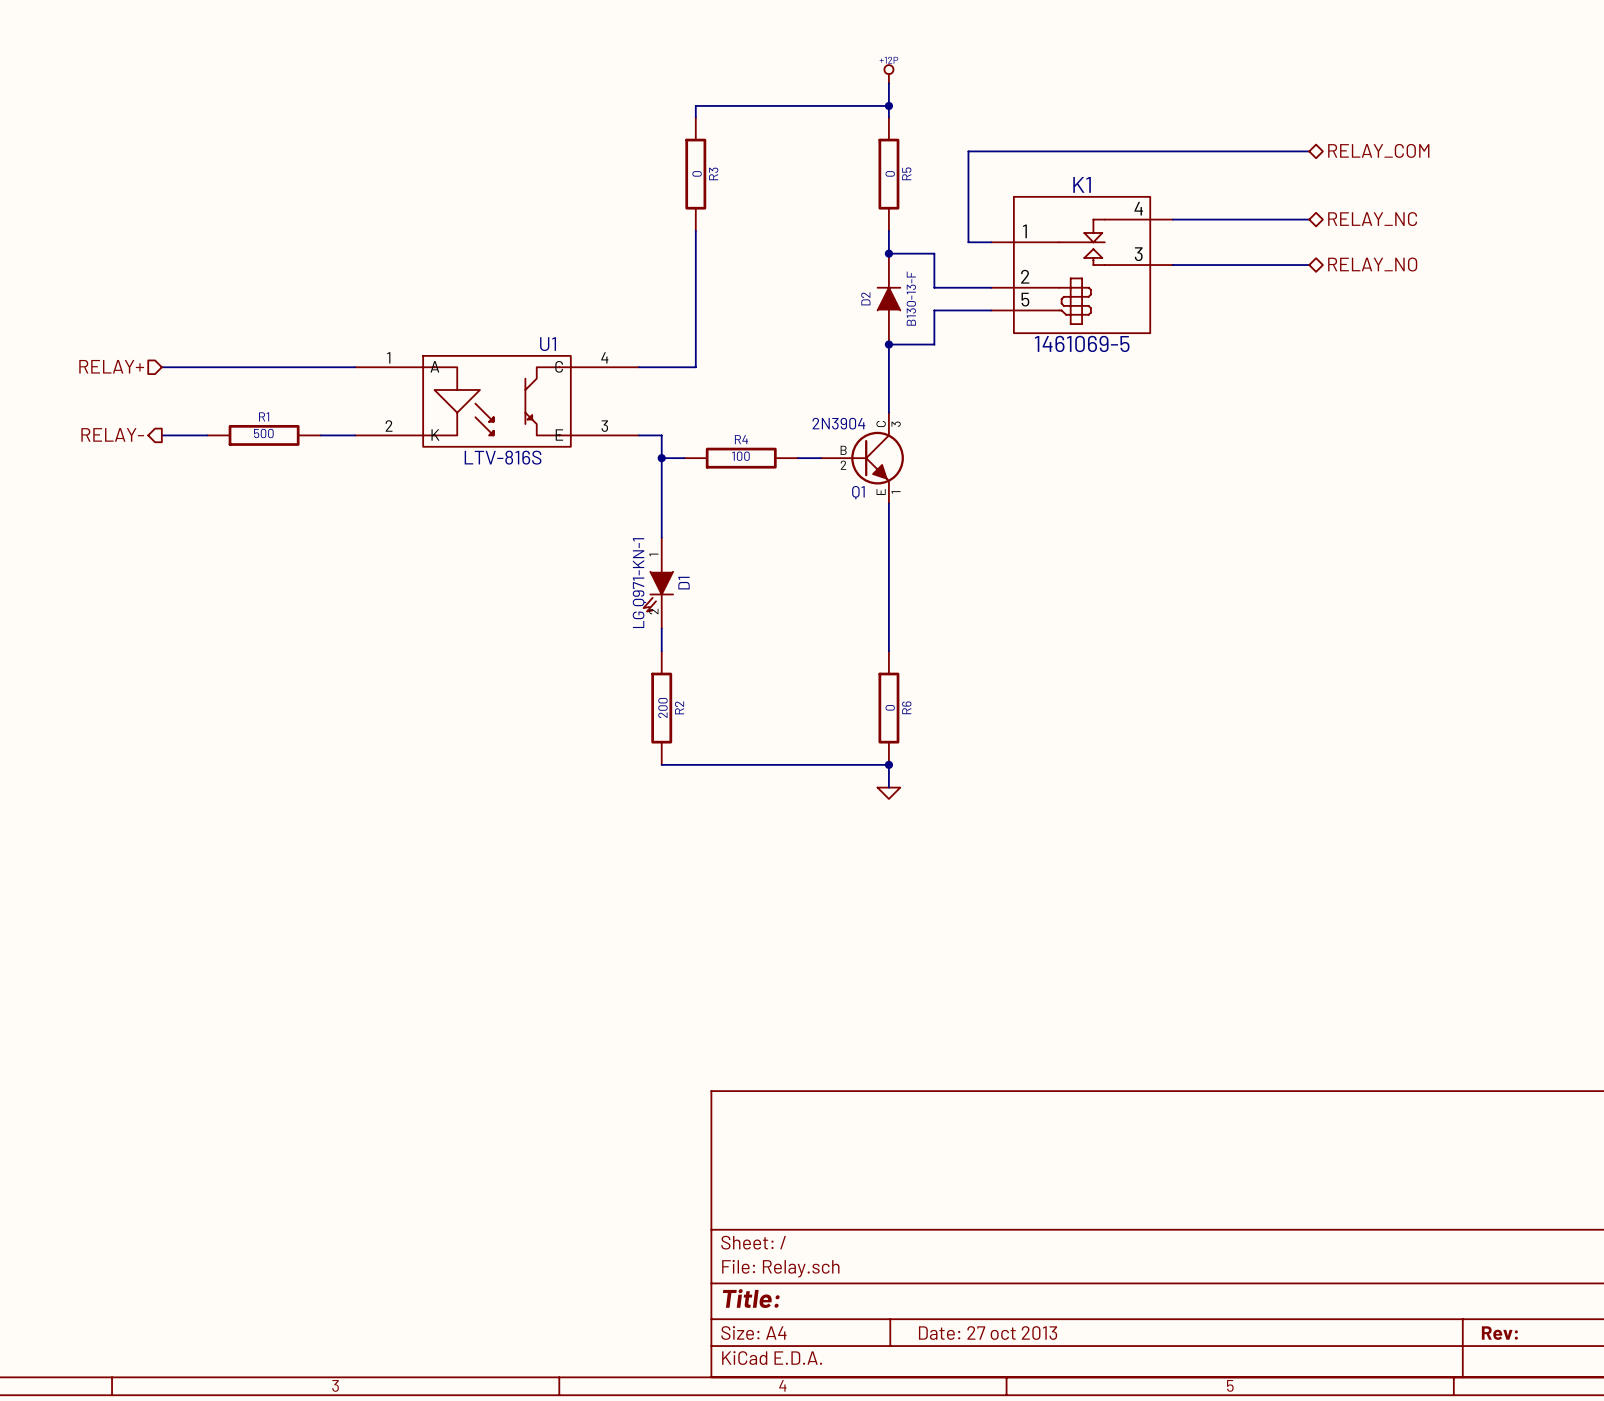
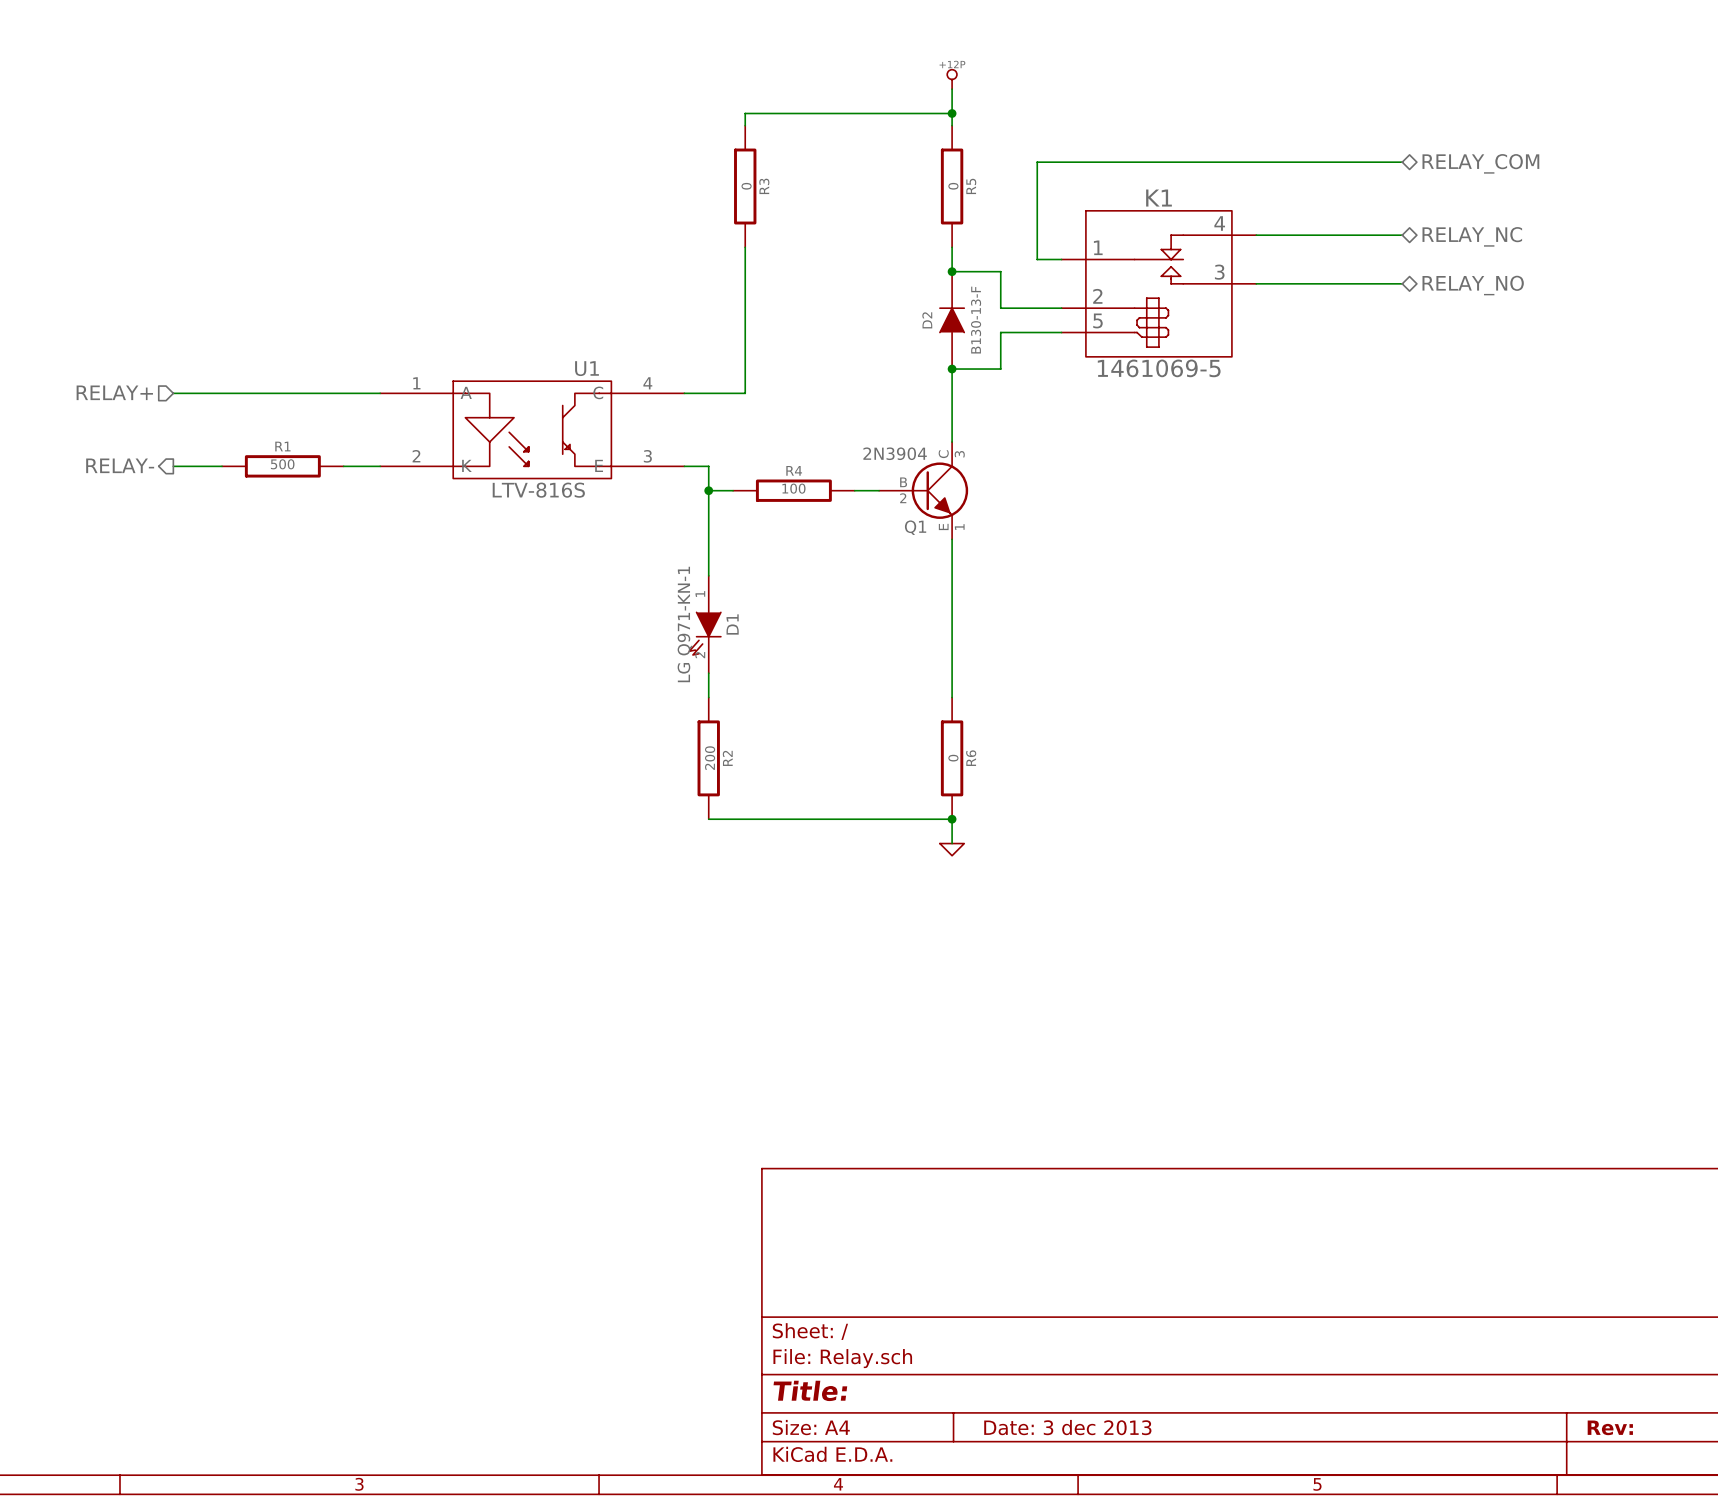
title block: Date: 27 oct 2013 (988, 1333) -> Date: 3 dec 2013 (1067, 1427)

